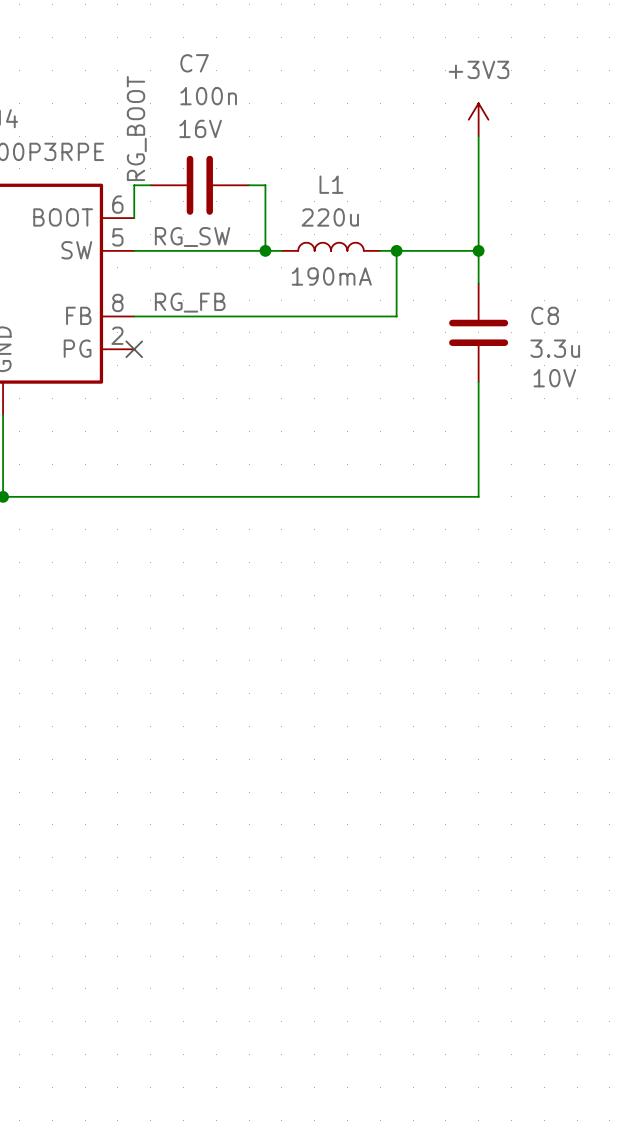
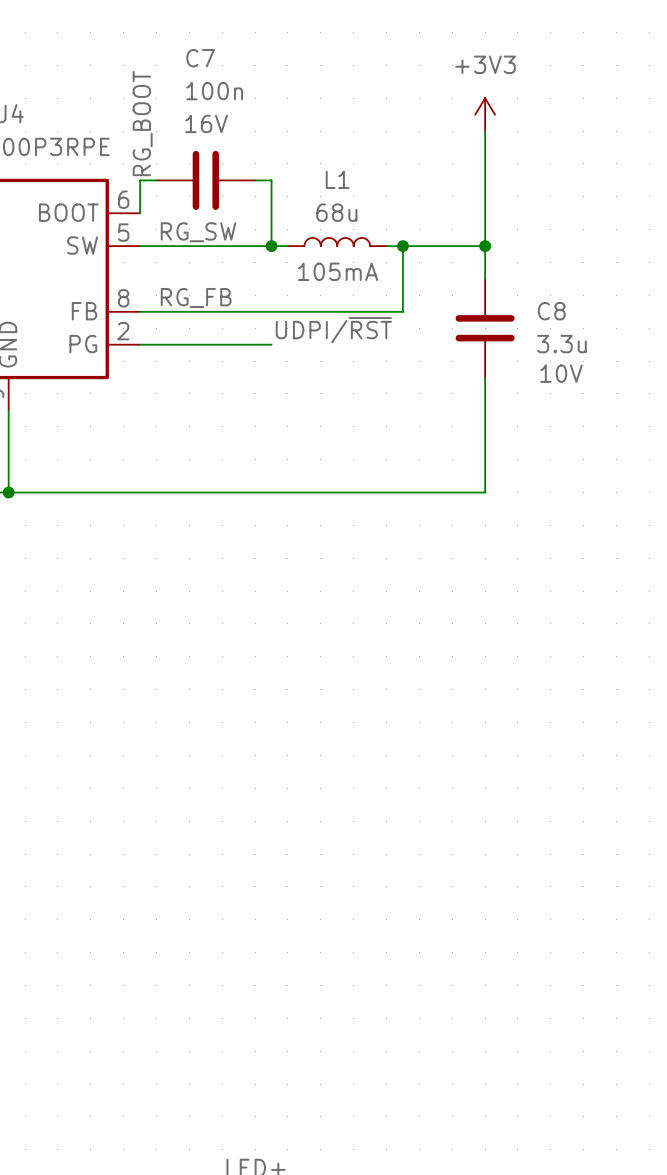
L1 value: 220u (330, 217) -> 68u (336, 212)
L1 text: 190mA (331, 276) -> 105mA (338, 271)
label: none -> UDPI/~{RST} (333, 330)
wire: none -> (140, 344) (271, 344)
no-connect mark: (134, 349) -> none

